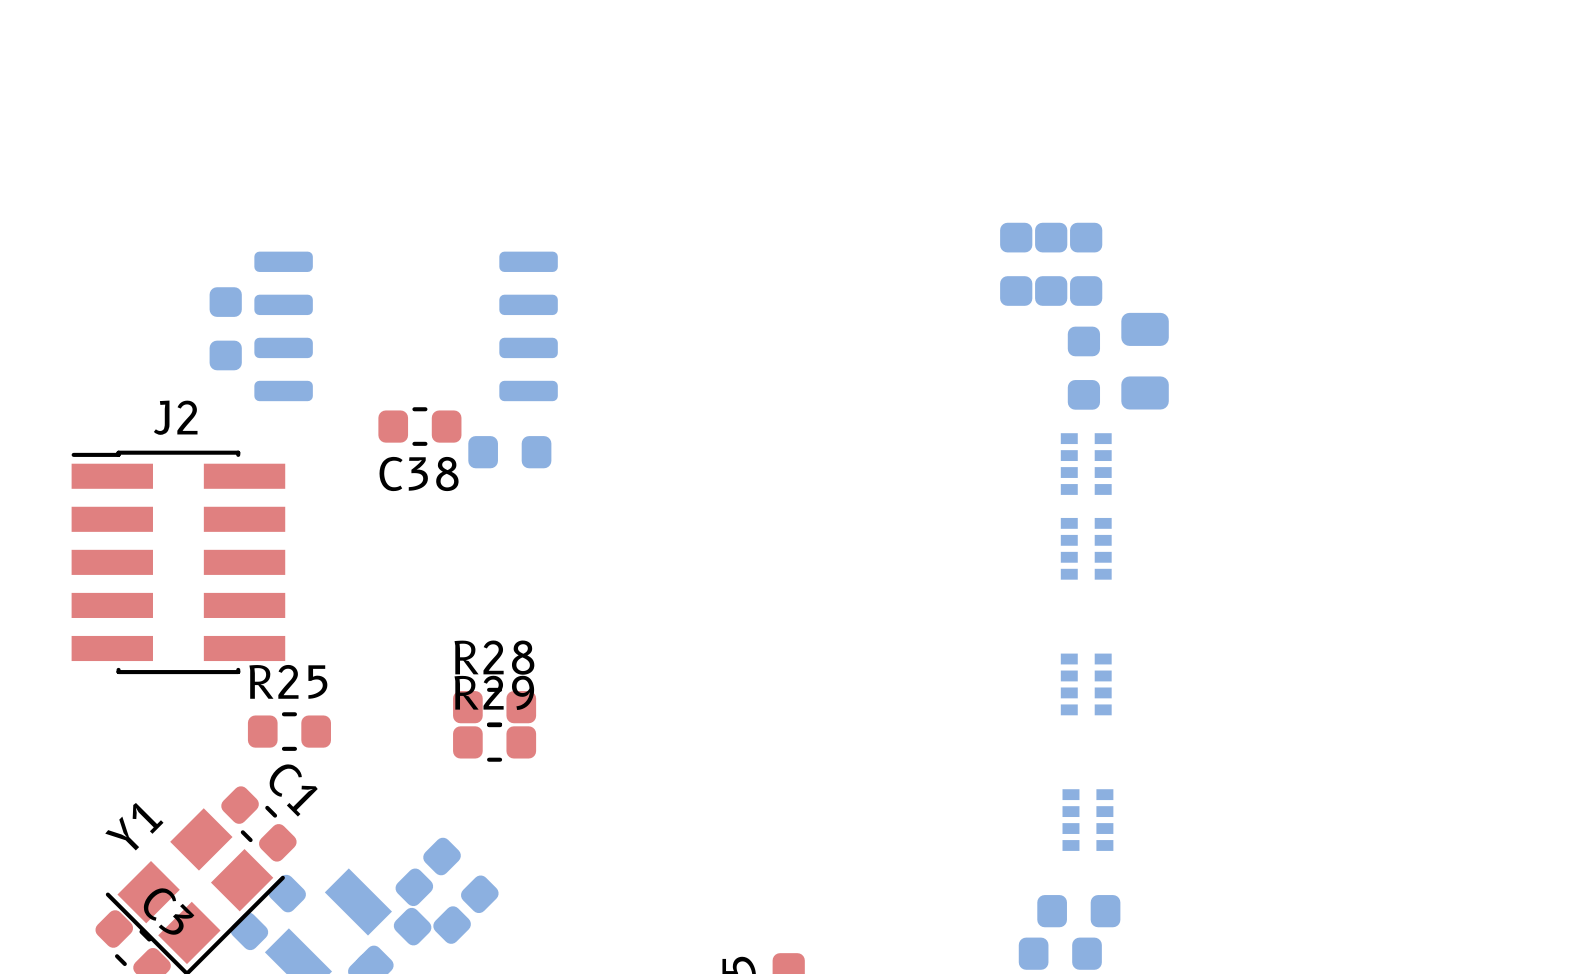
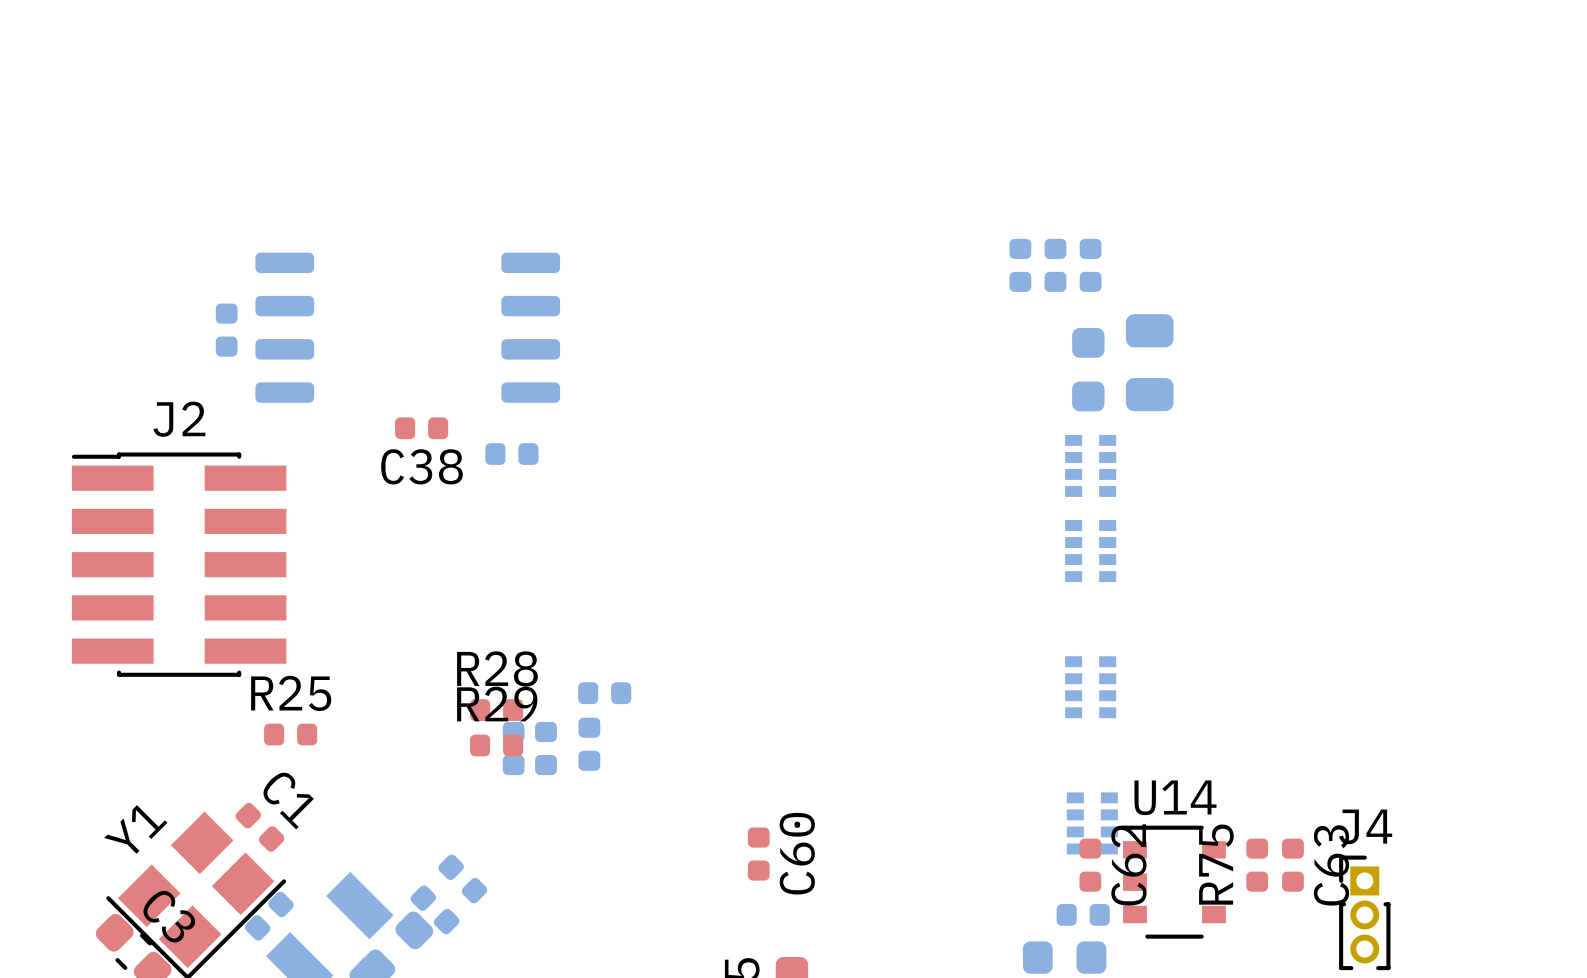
part footprint: [1000, 222, 1033, 306] -> [1009, 238, 1032, 292]
part footprint: [1035, 222, 1068, 306] -> [1044, 238, 1067, 292]
part footprint: [1070, 222, 1103, 306] -> [1079, 238, 1102, 292]
part footprint: [209, 287, 242, 371] -> [215, 303, 238, 357]
C38 footprint: [378, 407, 462, 446] -> [395, 417, 449, 440]
part footprint: [468, 436, 552, 469] -> [485, 443, 539, 465]
R28 footprint: [453, 687, 537, 727] -> [470, 699, 524, 721]
part: none -> (604, 693)
R25 footprint: [247, 712, 331, 751] -> [264, 723, 318, 746]
R29 footprint: [453, 723, 537, 762] -> [470, 734, 524, 757]
part: none -> (589, 744)
part: none -> (513, 748)
part: none -> (545, 748)
C1 footprint: [221, 786, 297, 862] -> [235, 802, 285, 852]
part footprint: [423, 837, 499, 914] -> [438, 854, 488, 904]
C60: none -> (758, 854)
C62: none -> (1090, 865)
R75: none -> (1257, 865)
C63: none -> (1292, 865)
part footprint: [395, 868, 471, 944] -> [410, 885, 460, 935]
part footprint: [230, 874, 306, 951] -> [244, 891, 294, 941]
U14: none -> (1173, 882)
part footprint: [1037, 895, 1121, 928] -> [1056, 903, 1110, 926]
J4: none -> (1364, 912)

